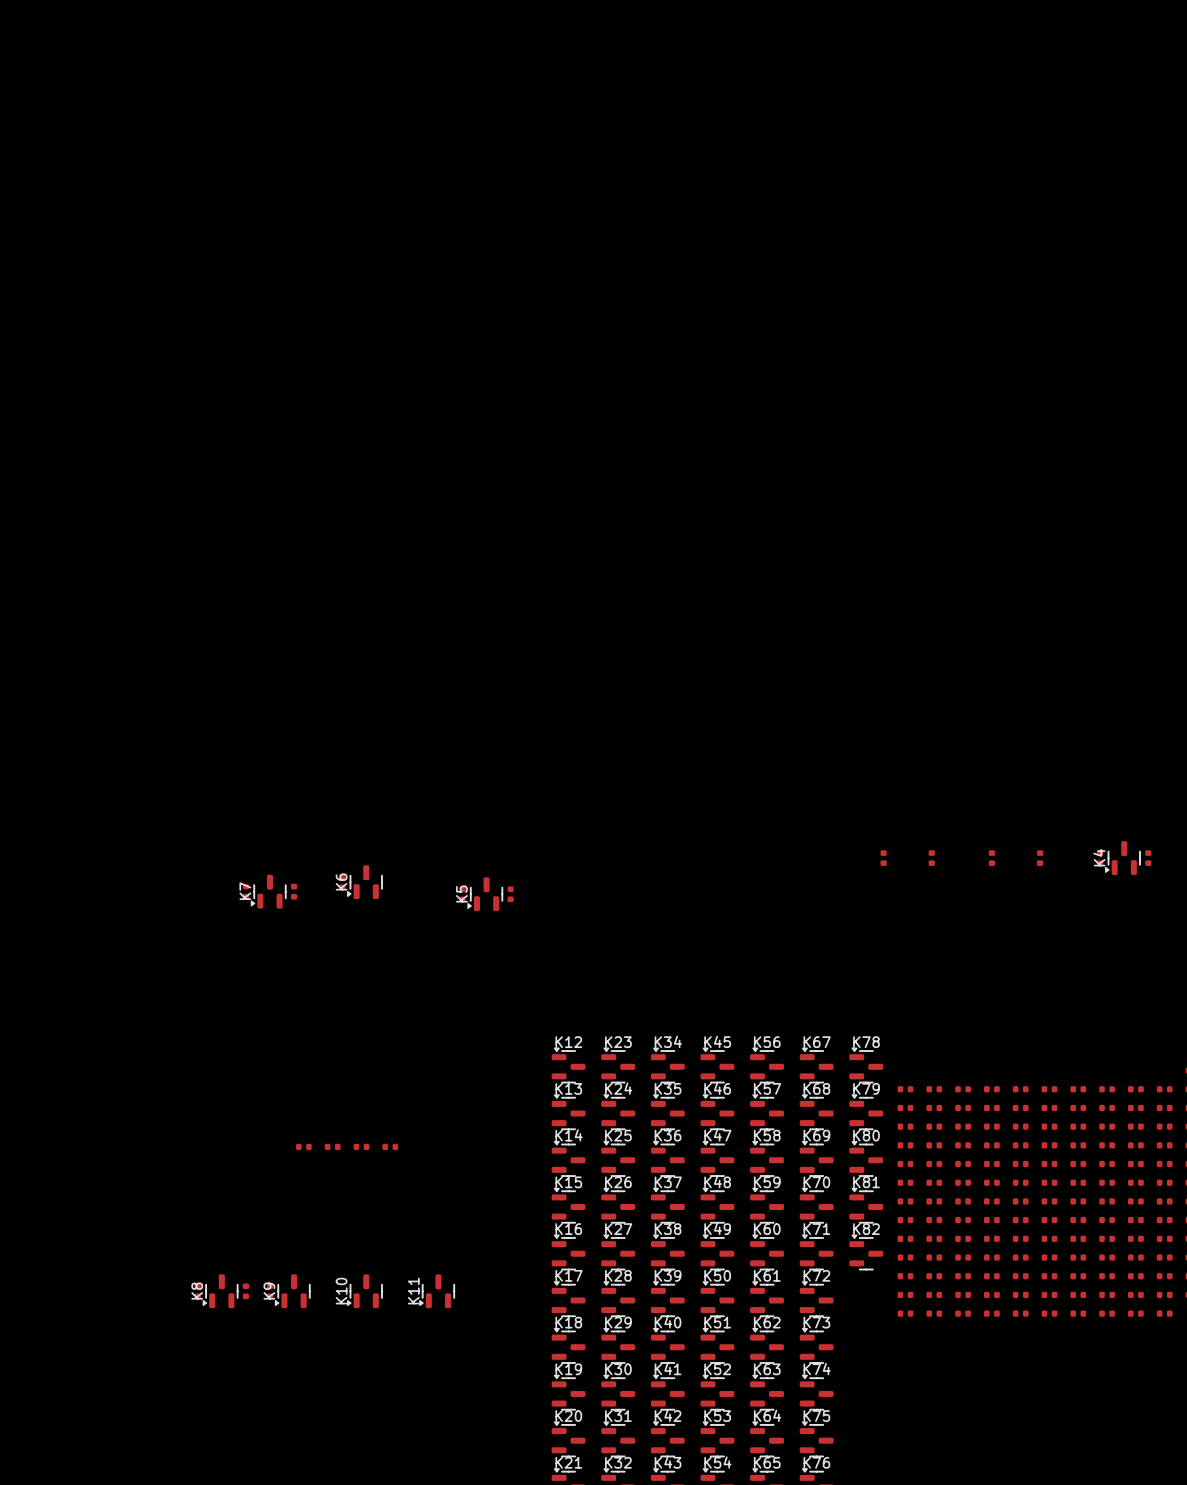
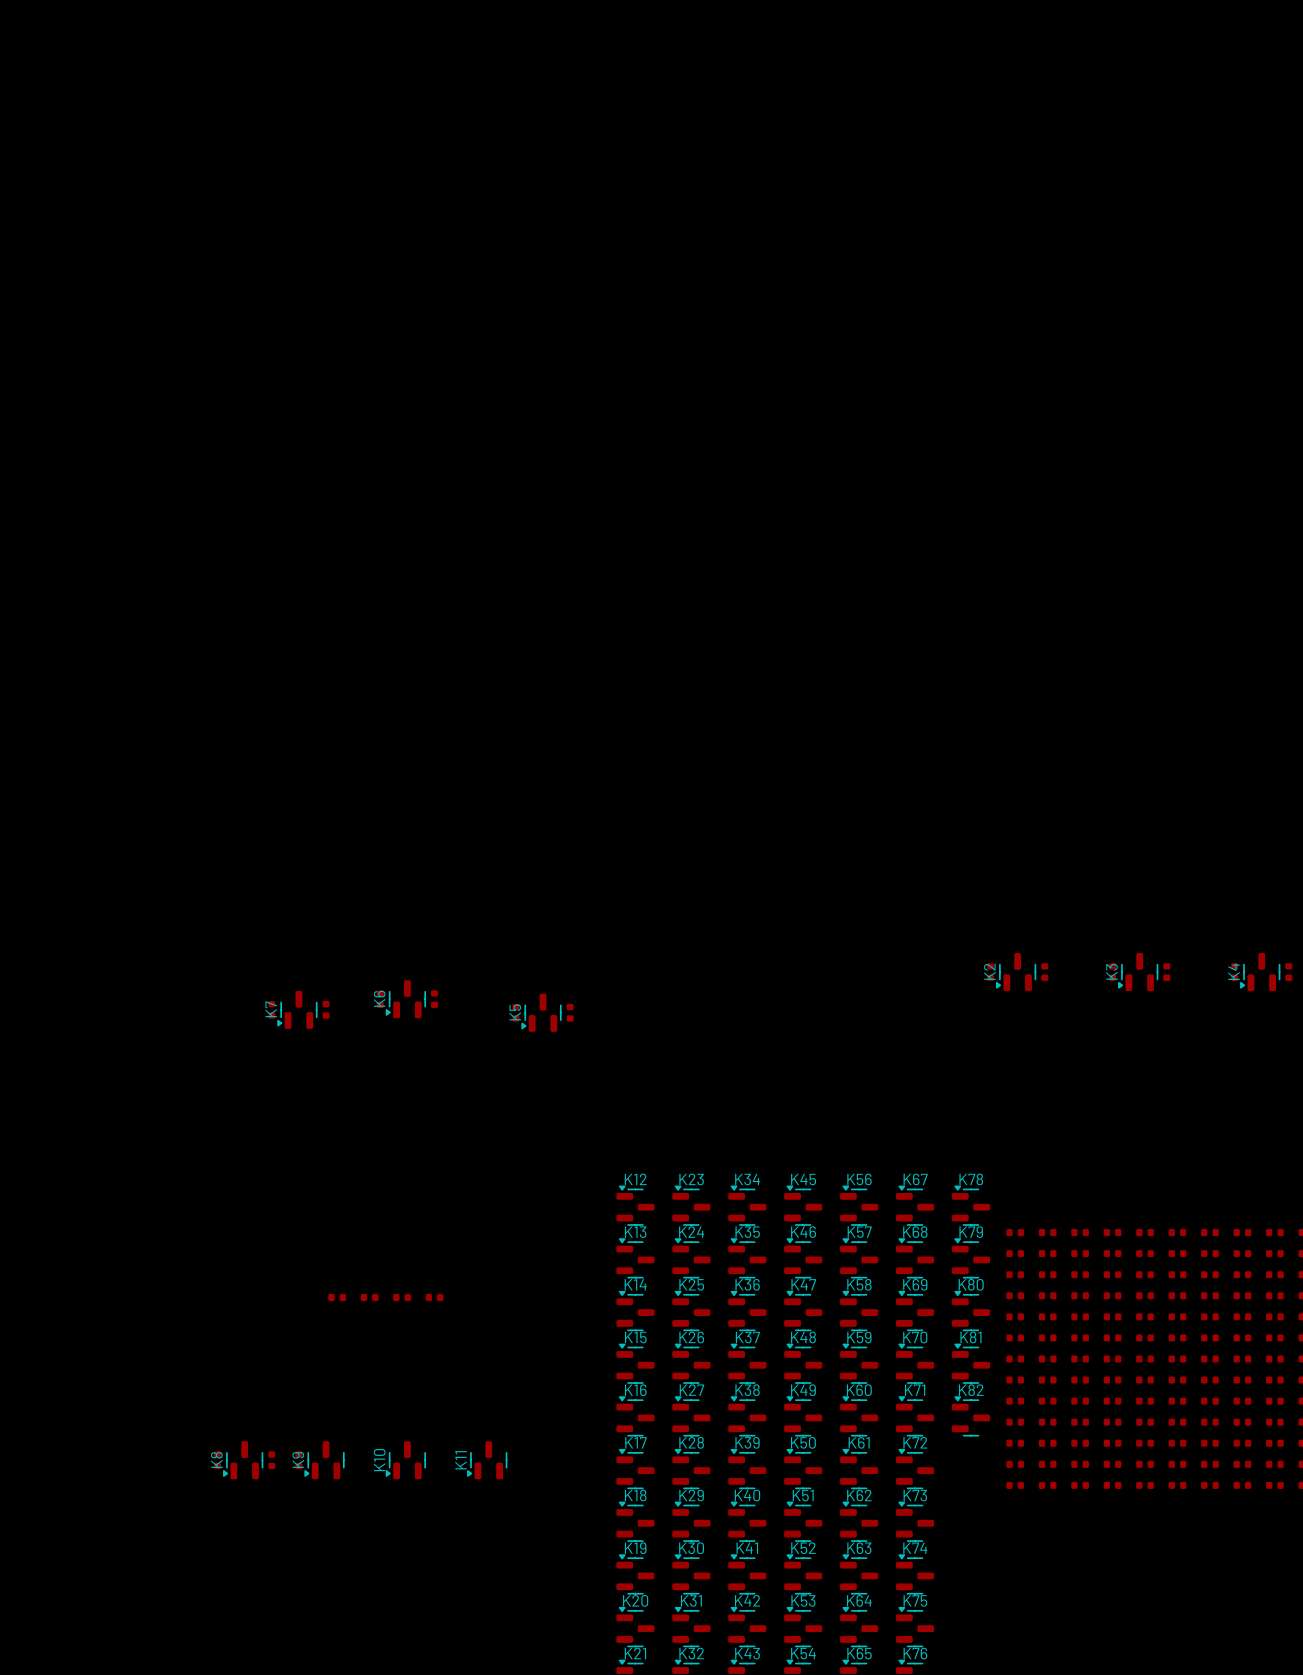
K2: none -> (1016, 972)
K3: none -> (1138, 972)
part: none -> (434, 999)

